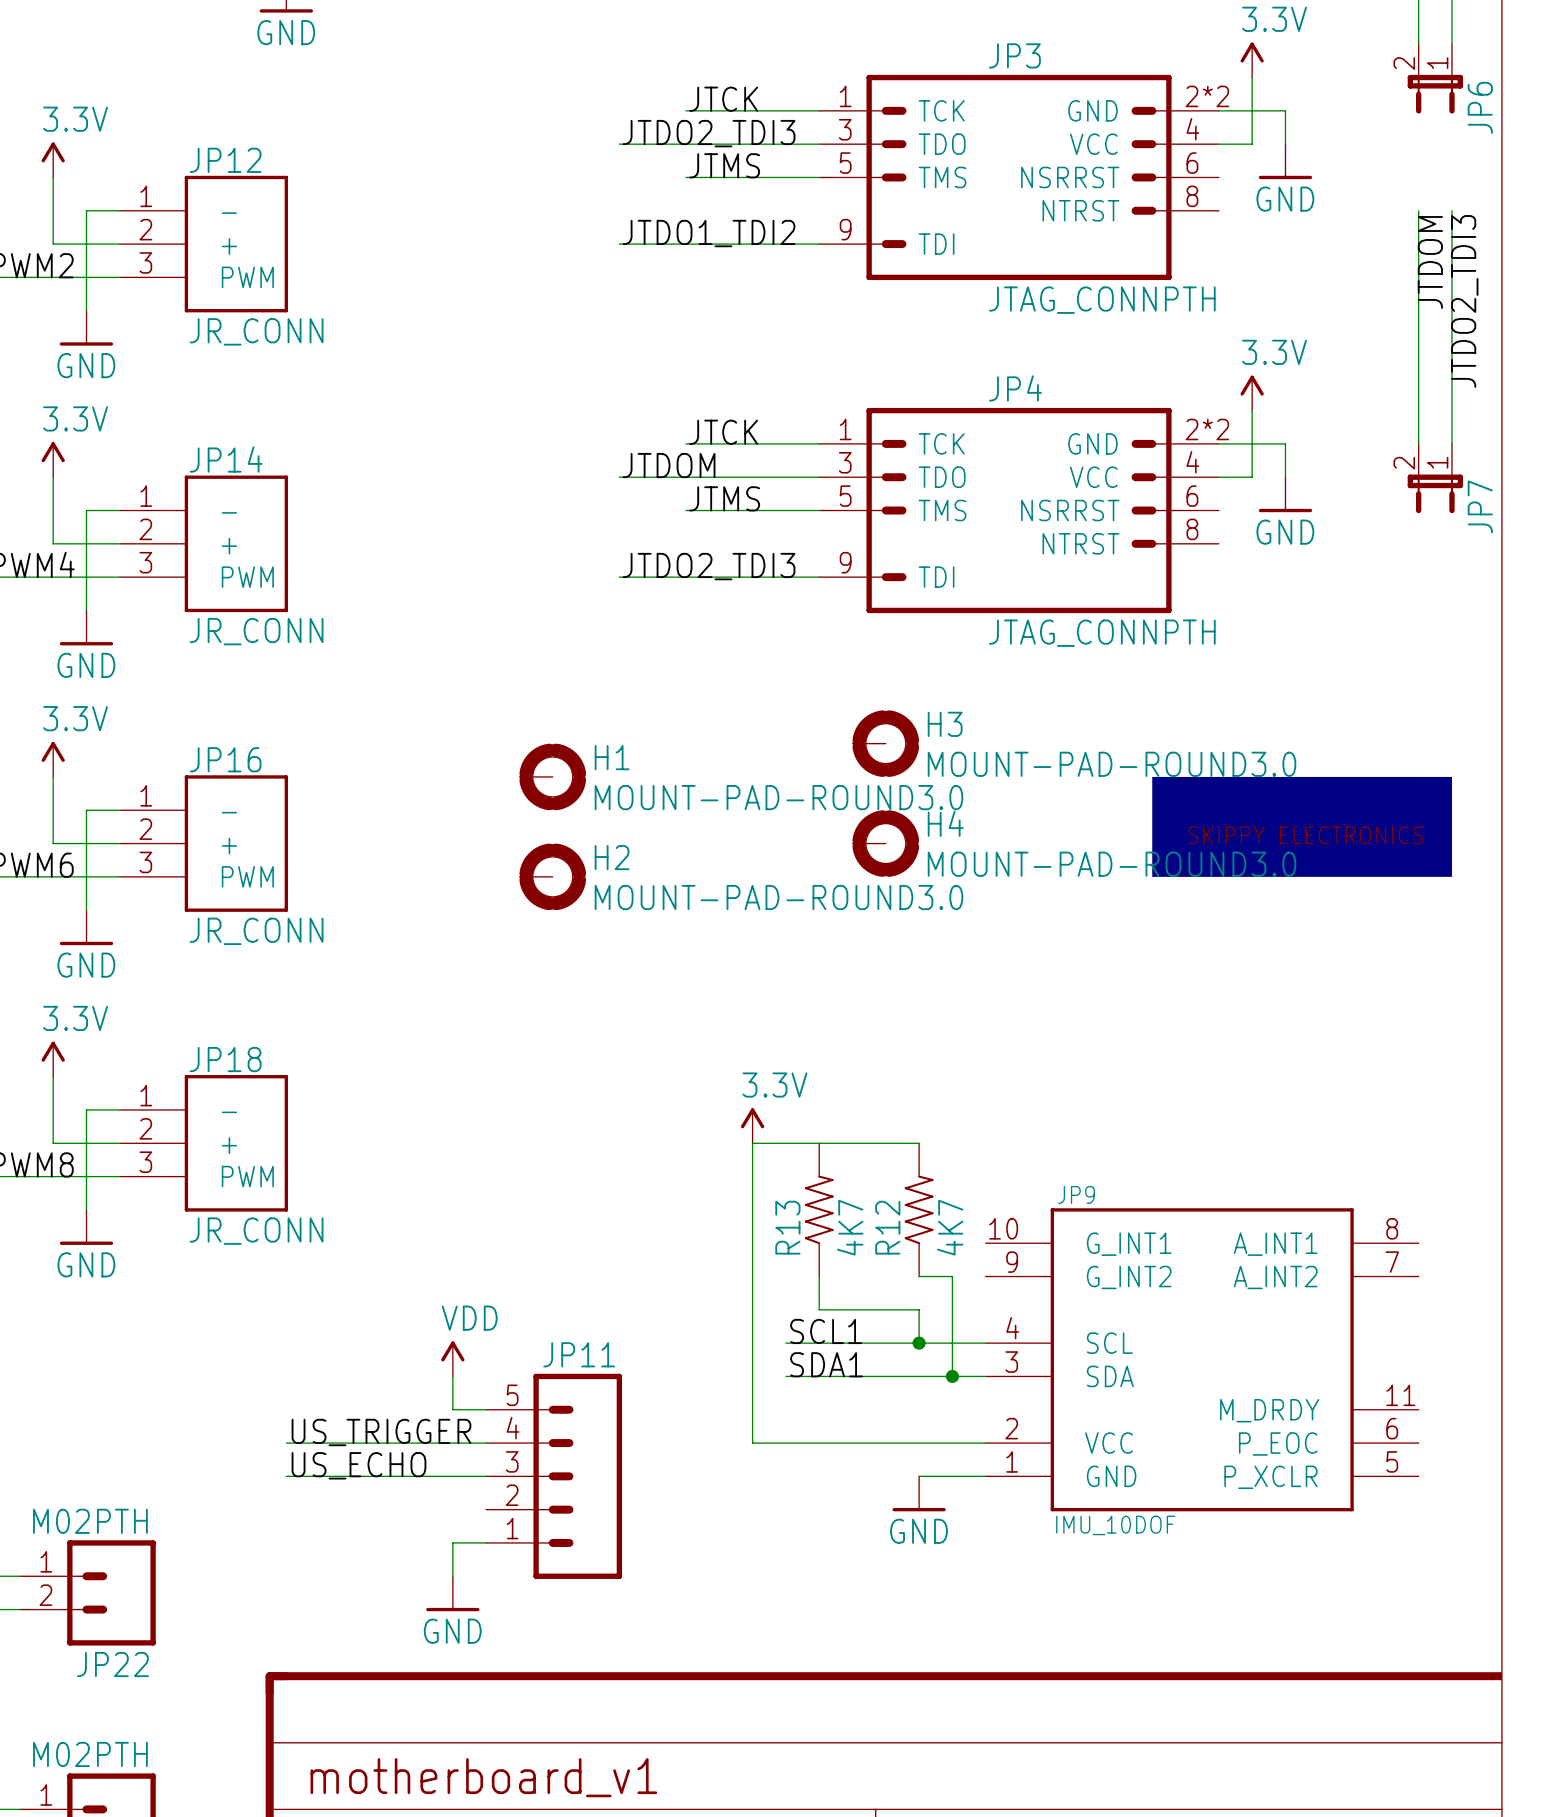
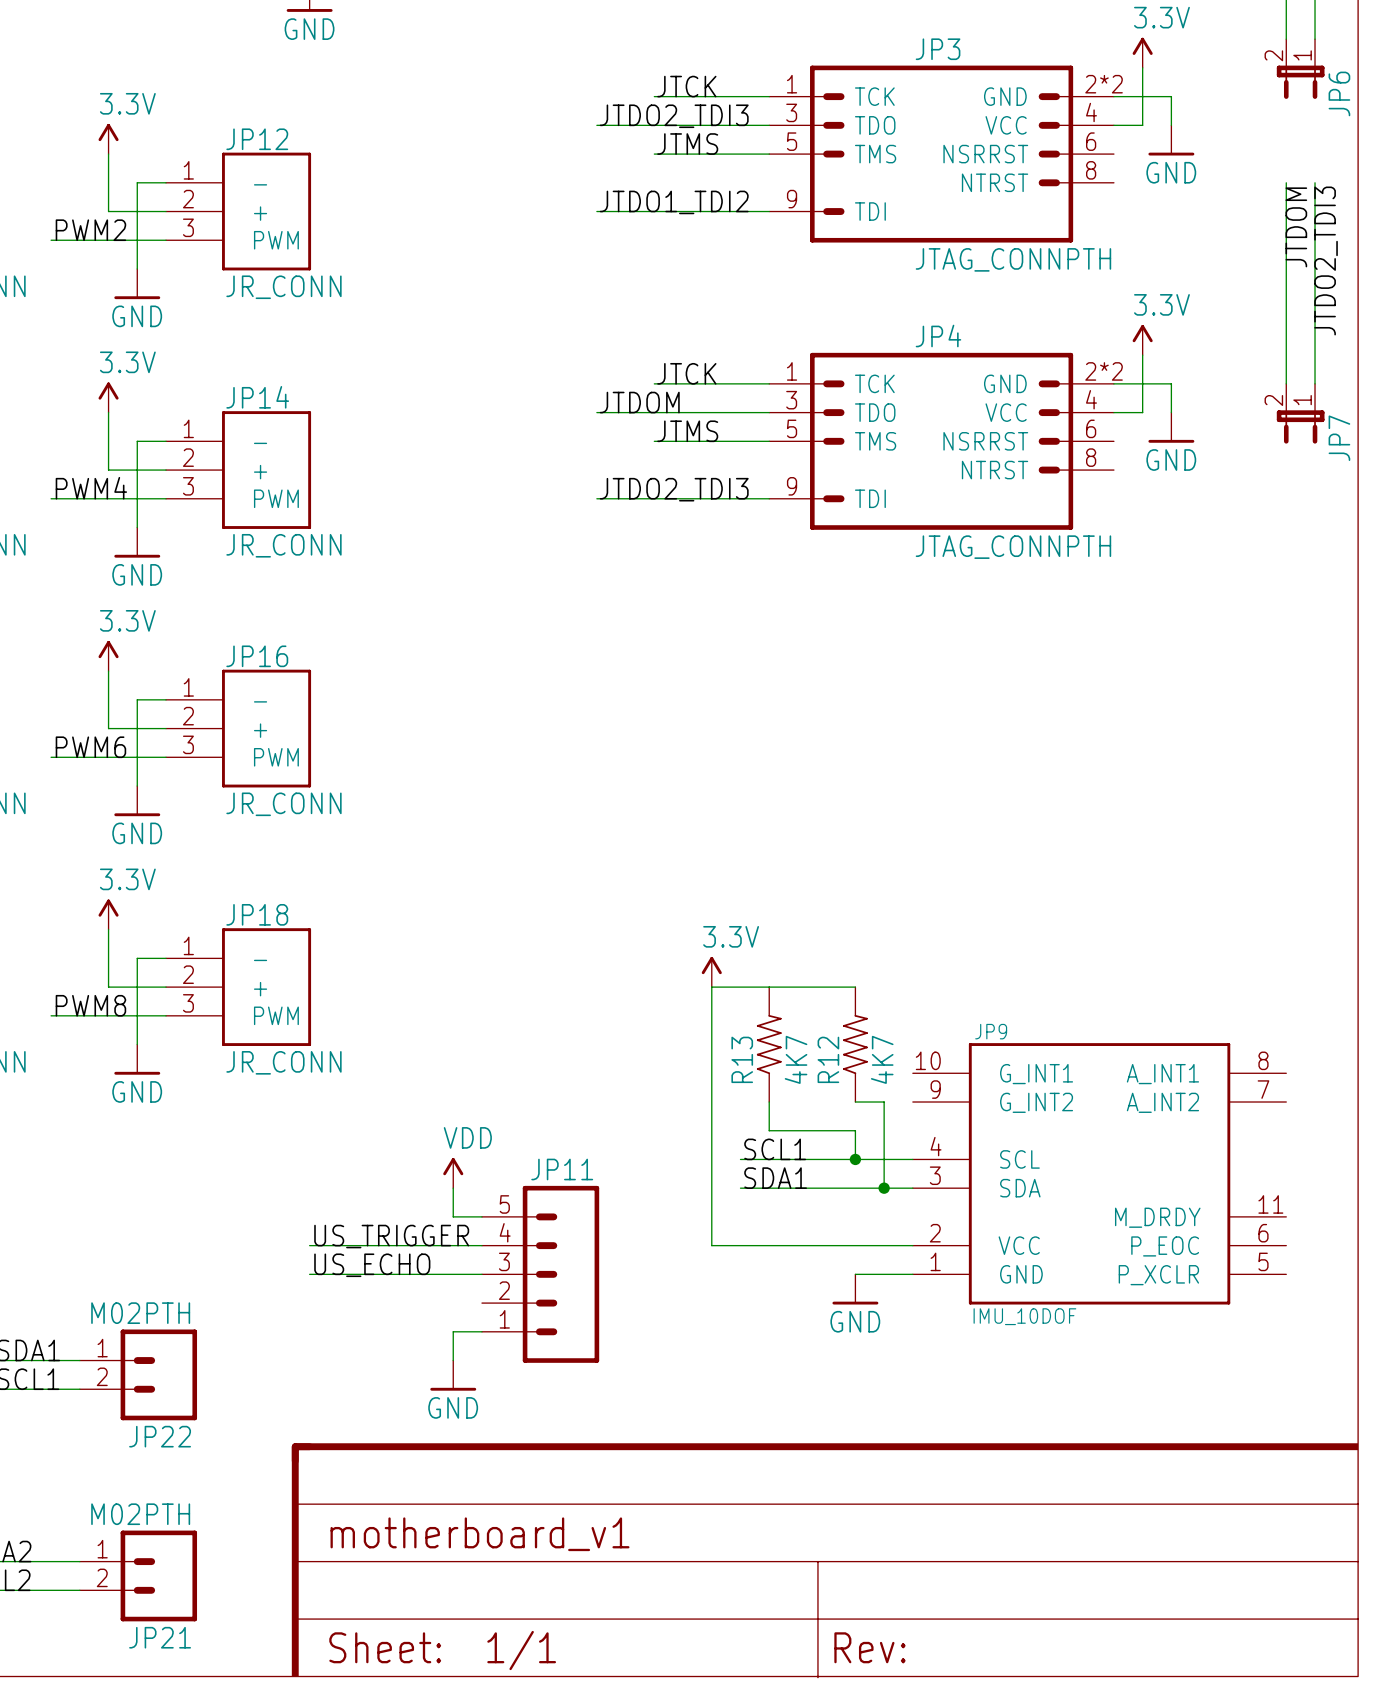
H3: MOUNT-PAD-ROUND3.0 (885, 743) -> none
H1: MOUNT-PAD-ROUND3.0 (552, 776) -> none
part: (1302, 826) -> none
H4: MOUNT-PAD-ROUND3.0 (885, 843) -> none
H2: MOUNT-PAD-ROUND3.0 (552, 876) -> none

